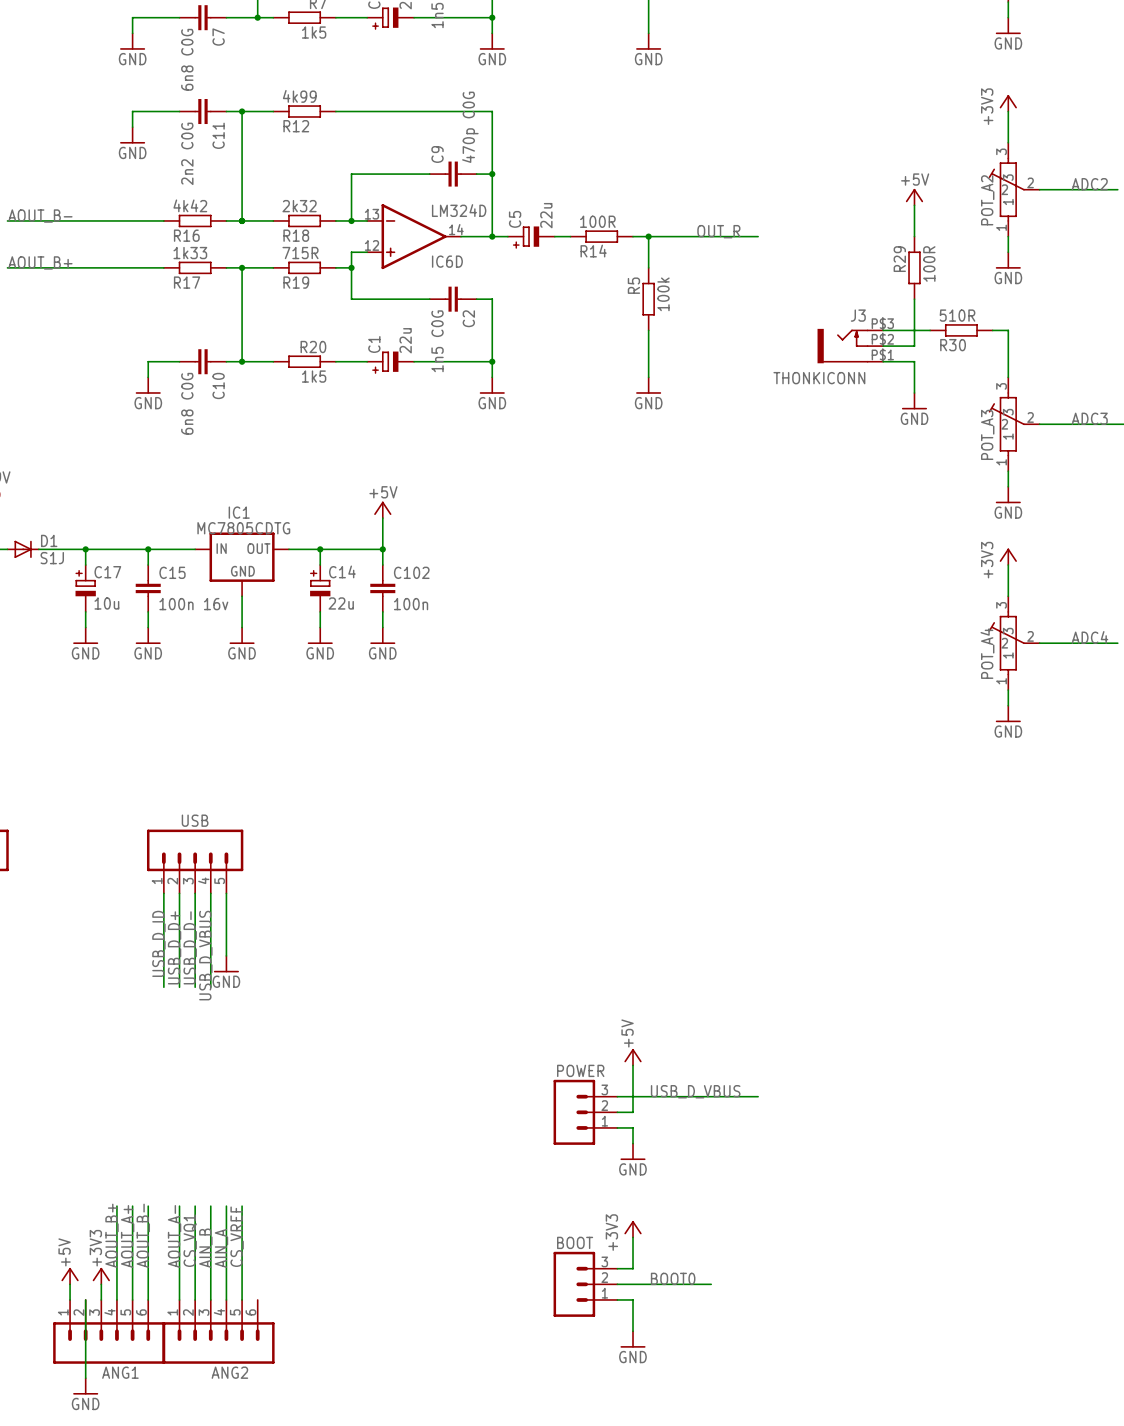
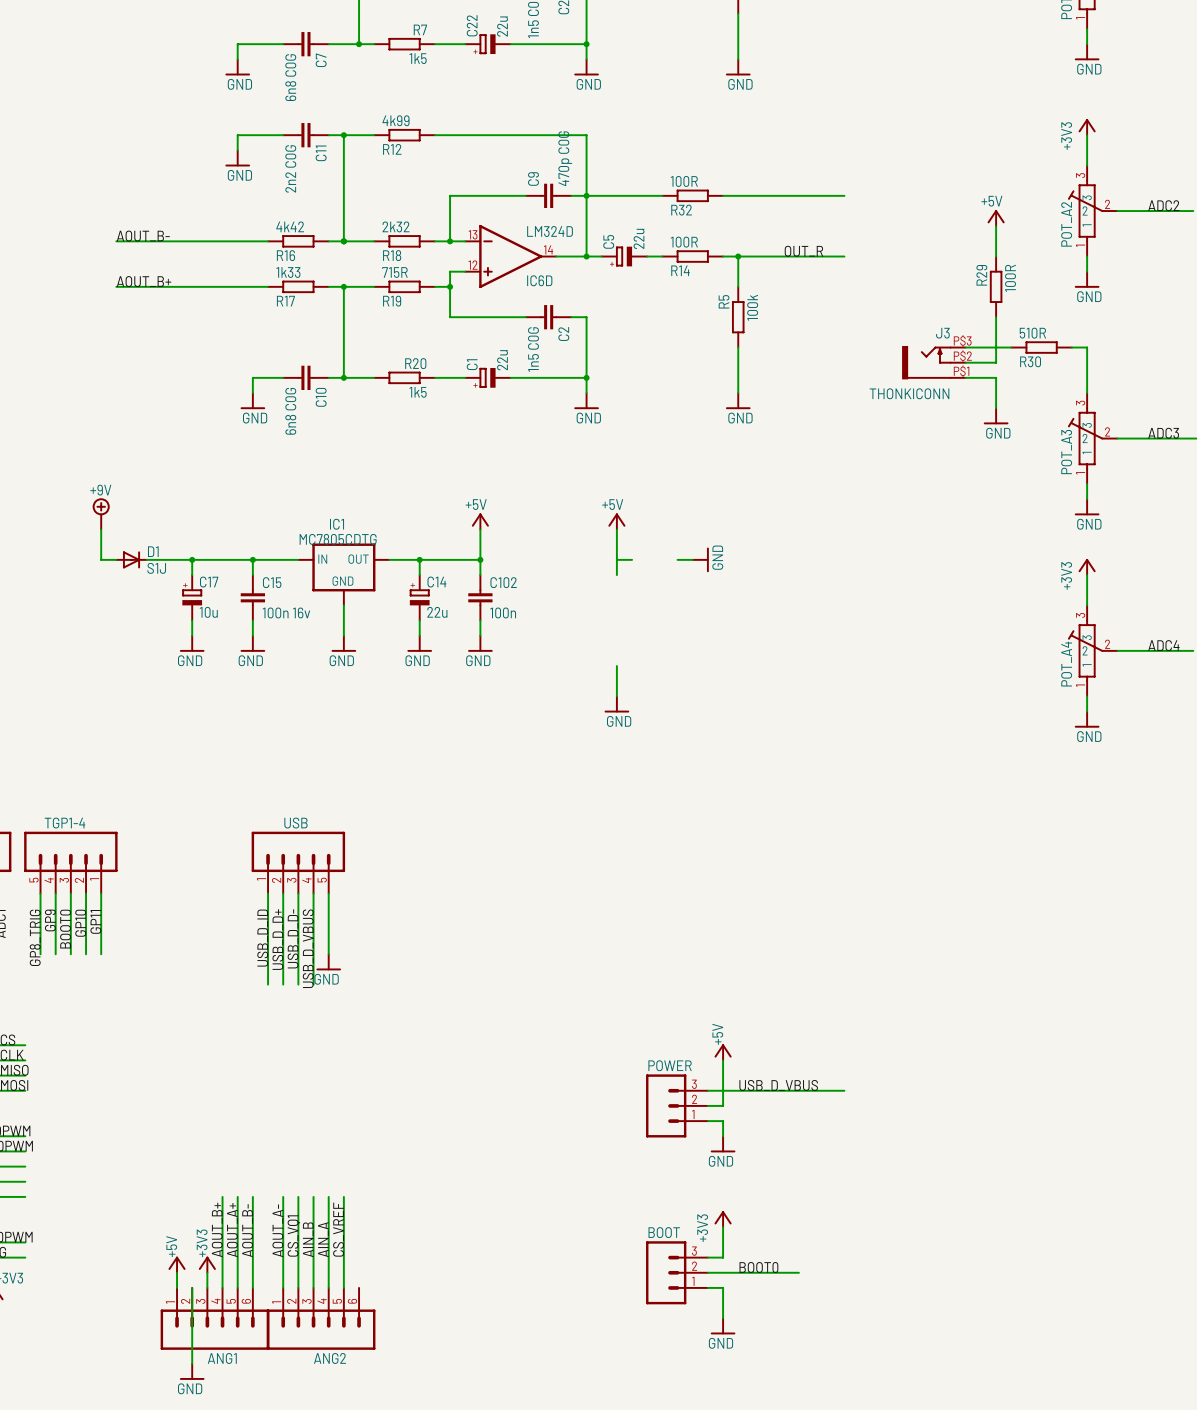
wire: none -> (586, 195) (662, 195)
R32: none -> 100R (692, 195)
wire: none -> (723, 195) (844, 195)
power symbol: none -> +5V (616, 521)
wire: none -> (616, 529) (616, 575)
wire: none -> (616, 559) (632, 559)
wire: none -> (677, 559) (692, 559)
power symbol: none -> GND (700, 559)
wire: none -> (616, 666) (616, 696)
power symbol: none -> GND (616, 704)

